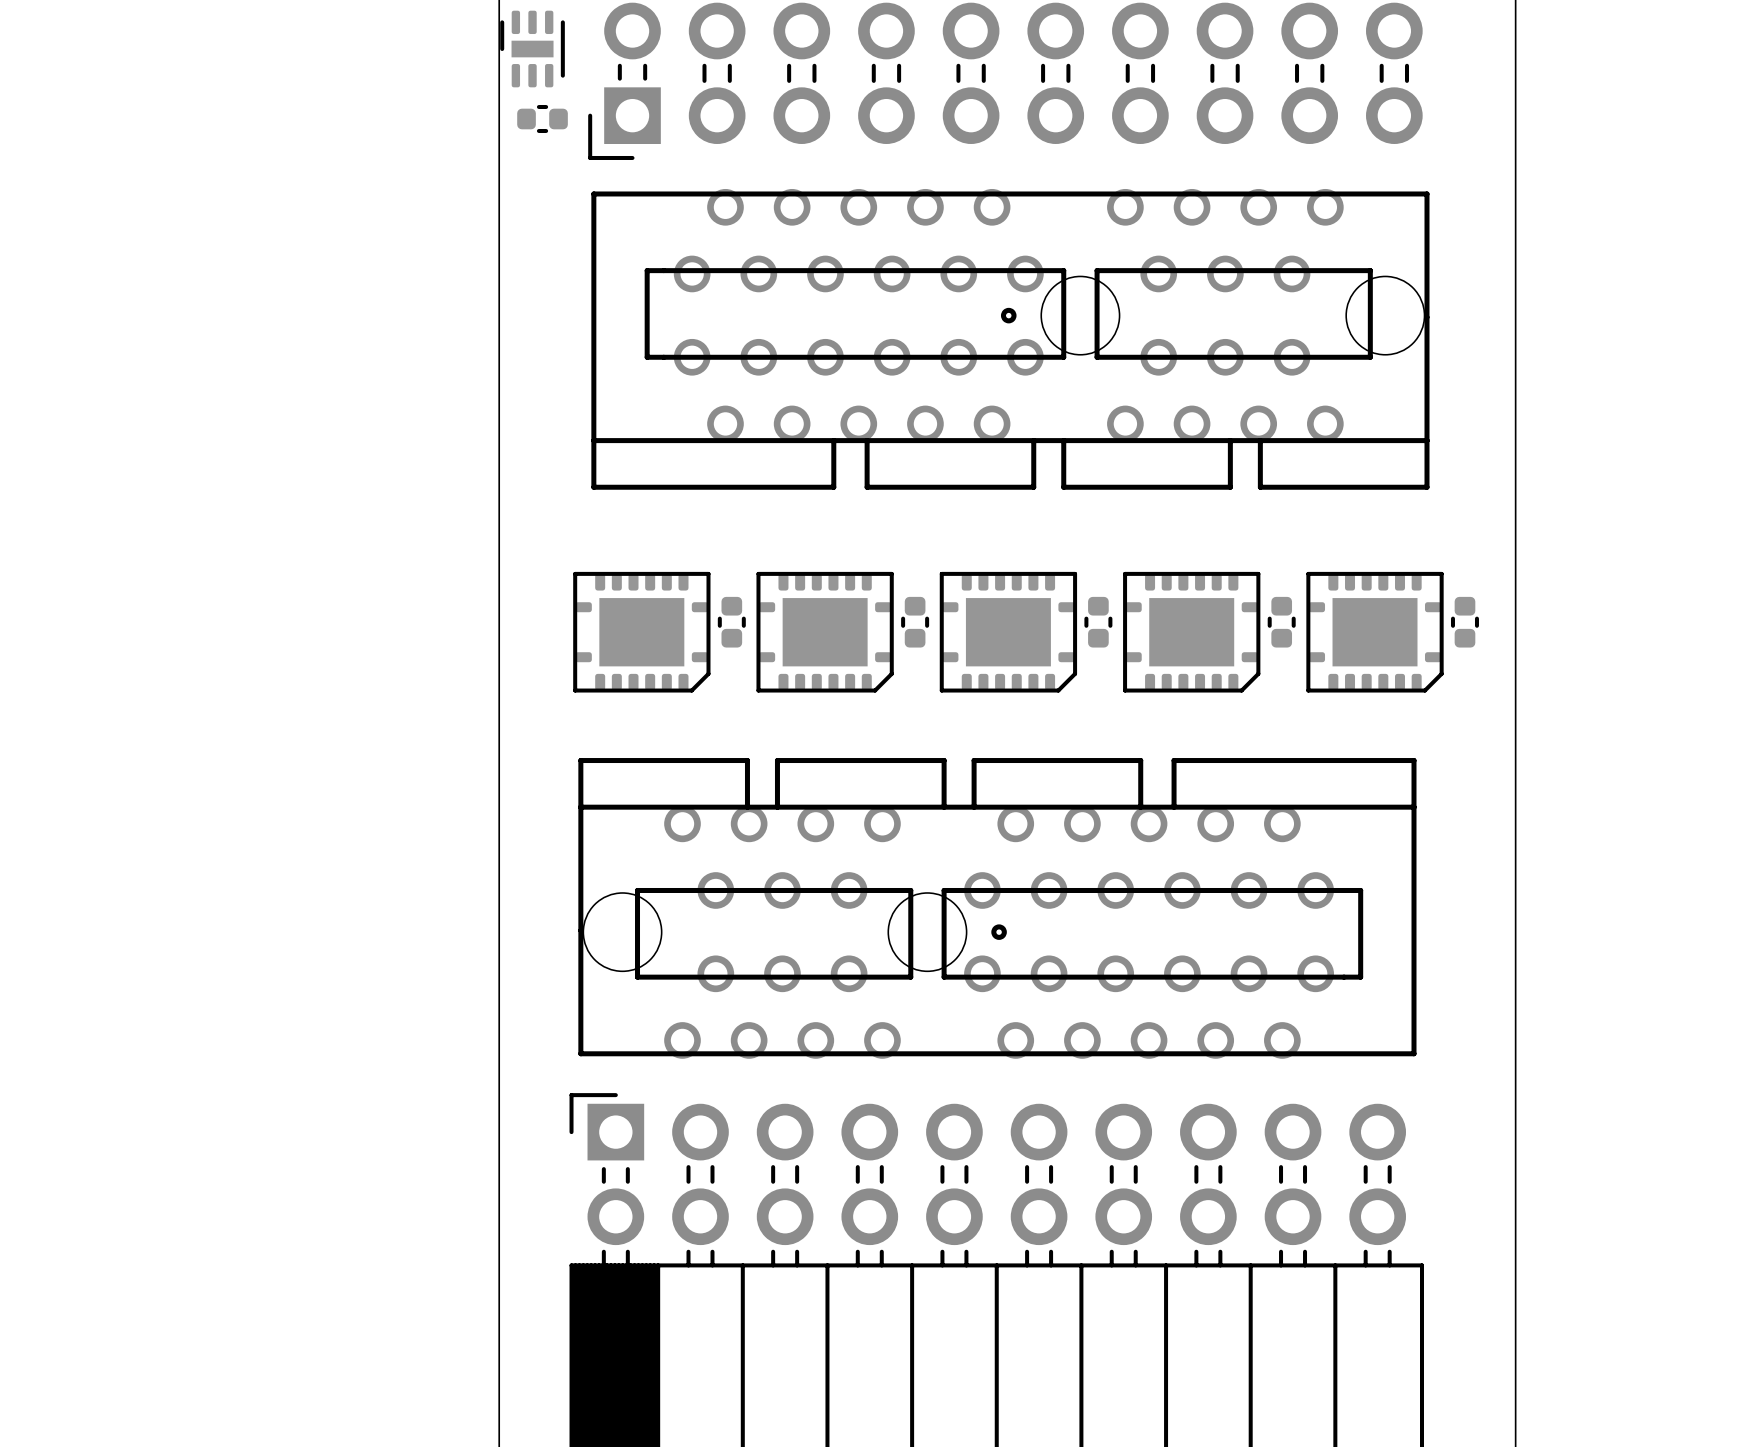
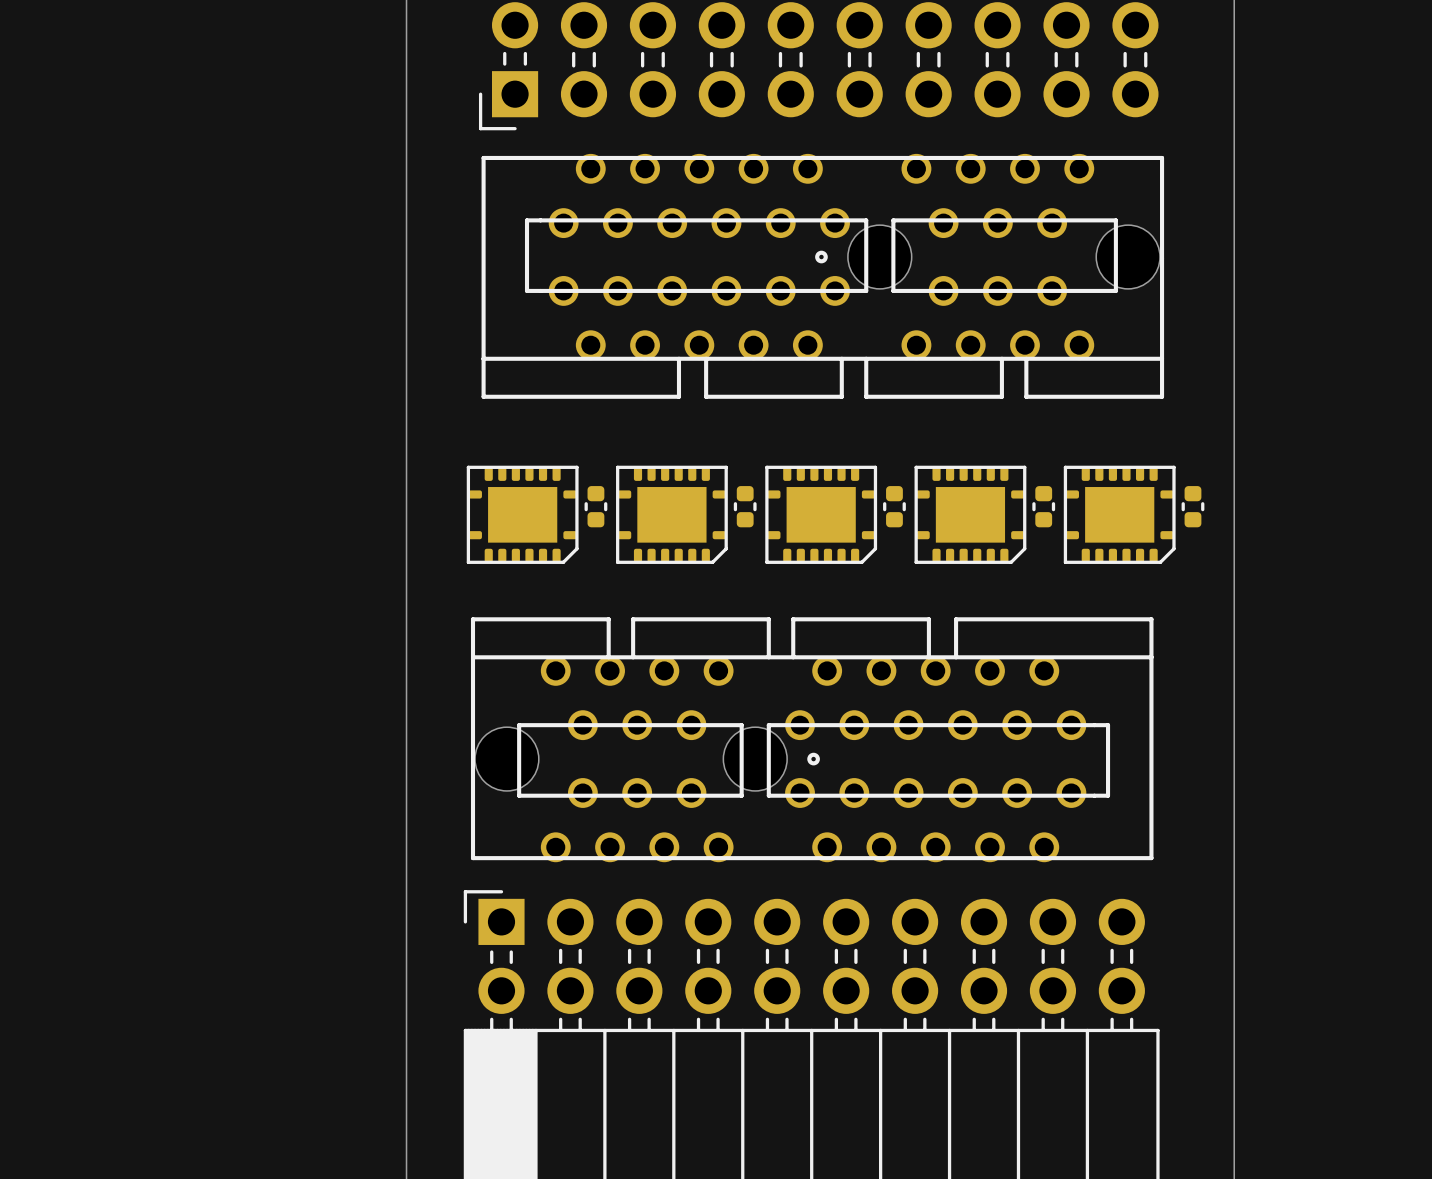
part: (532, 49) -> none
part: (542, 118) -> none

